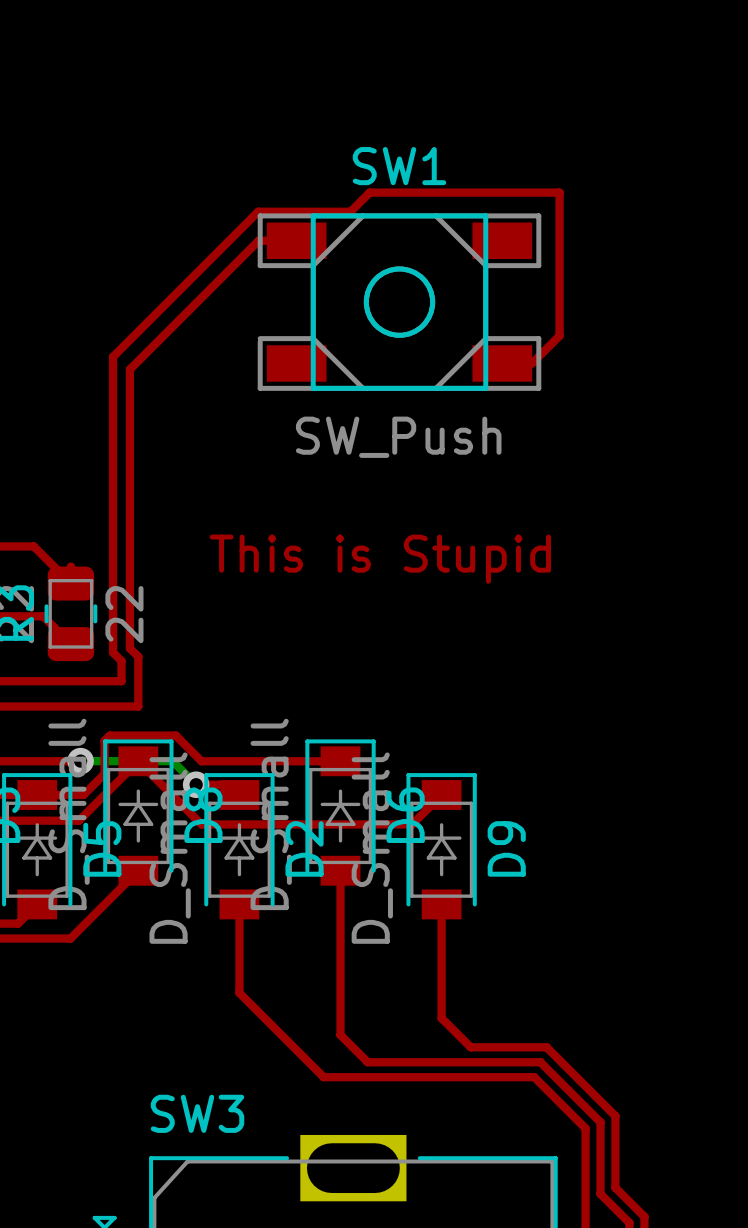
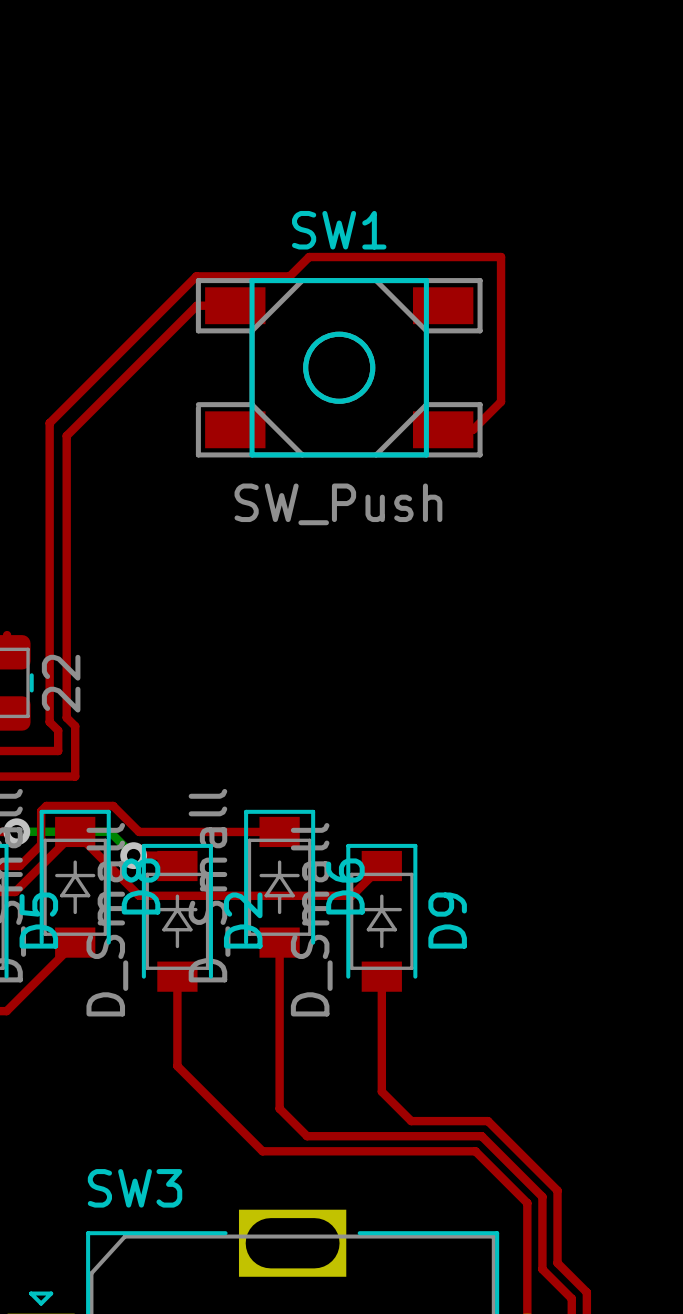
text: This is Stupid (380, 559) -> none

